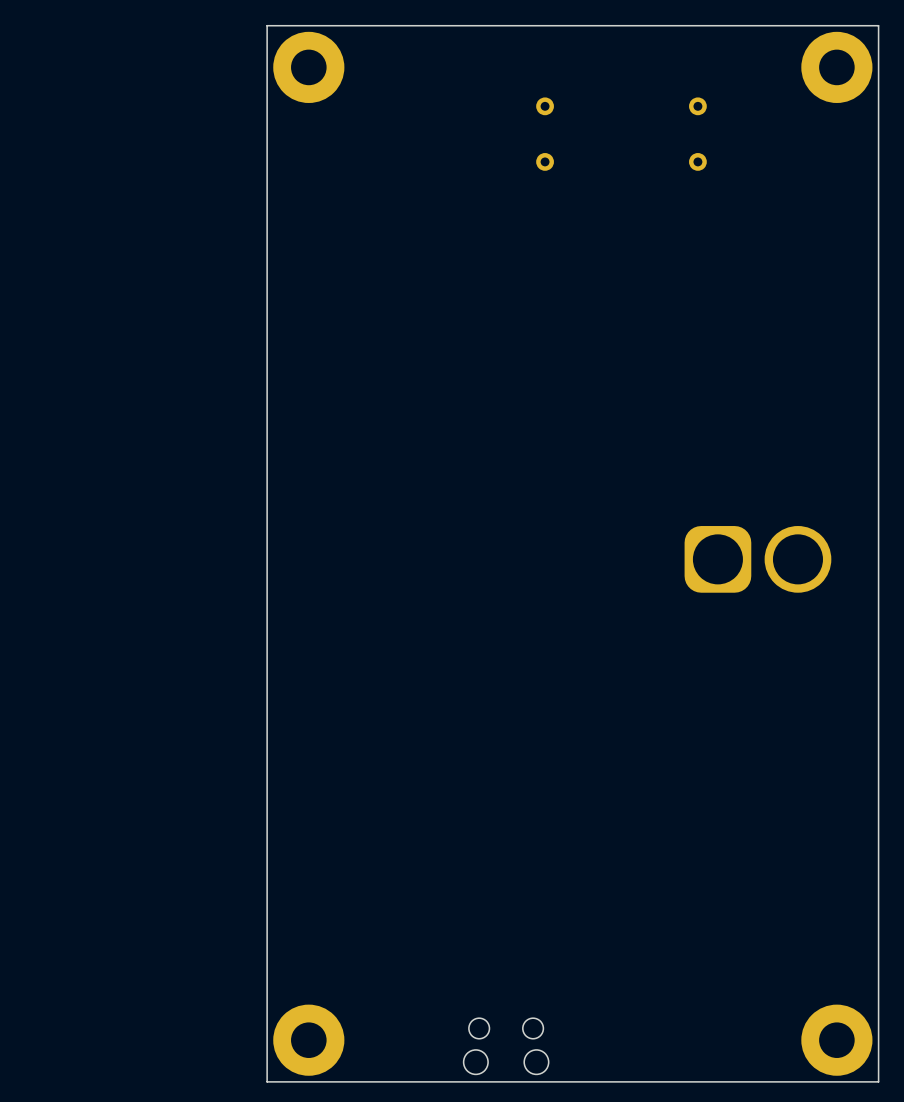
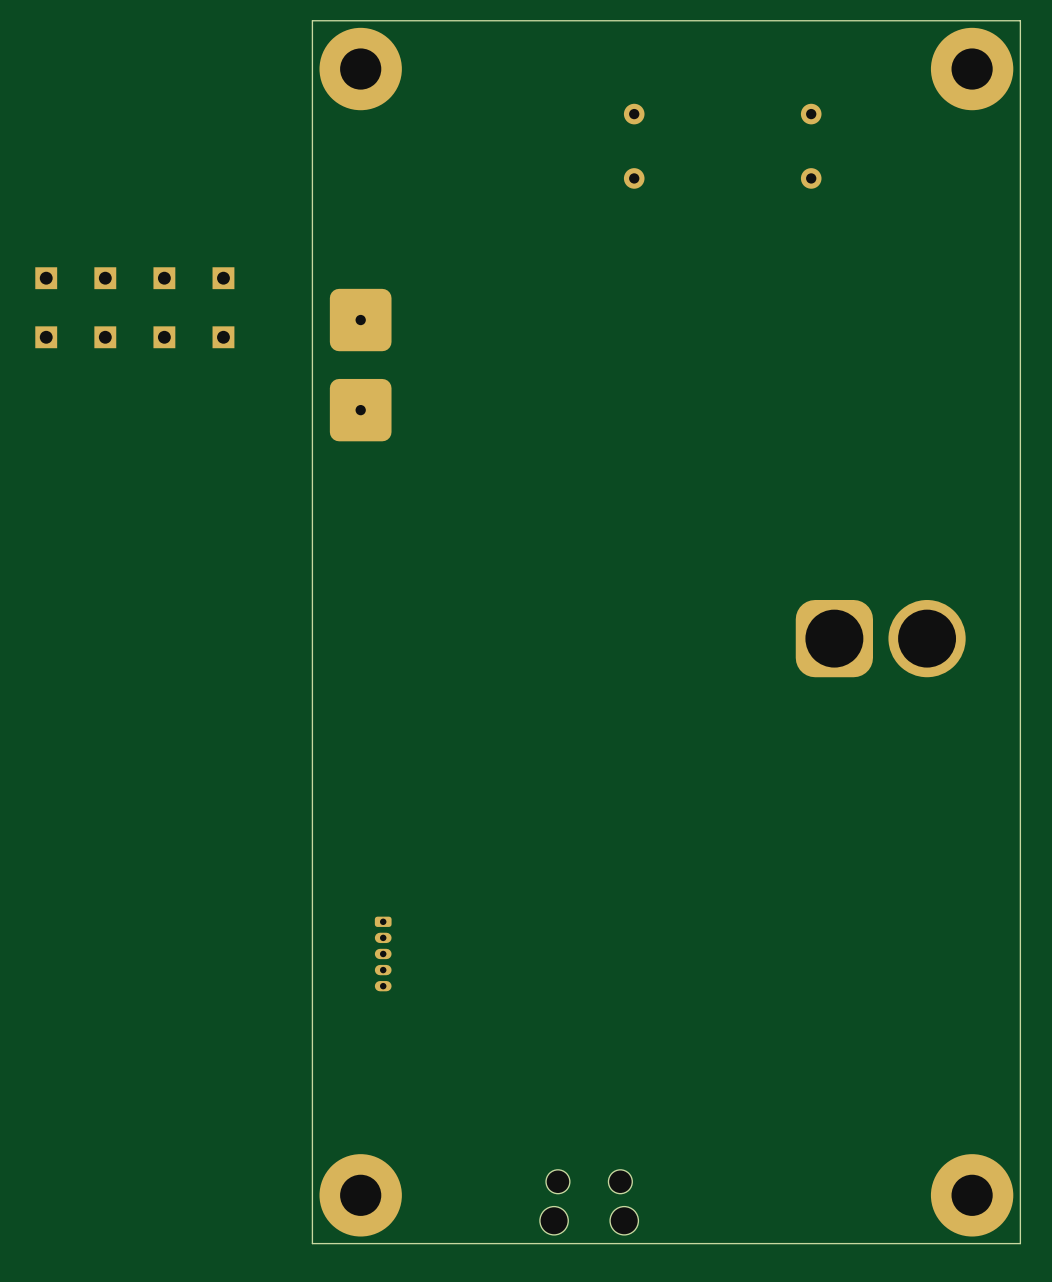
part: none -> (46, 278)
part: none -> (105, 278)
part: none -> (164, 278)
part: none -> (223, 278)
part: none -> (360, 320)
part: none -> (46, 337)
part: none -> (105, 337)
part: none -> (164, 337)
part: none -> (223, 337)
part: none -> (360, 410)
part: none -> (383, 953)

